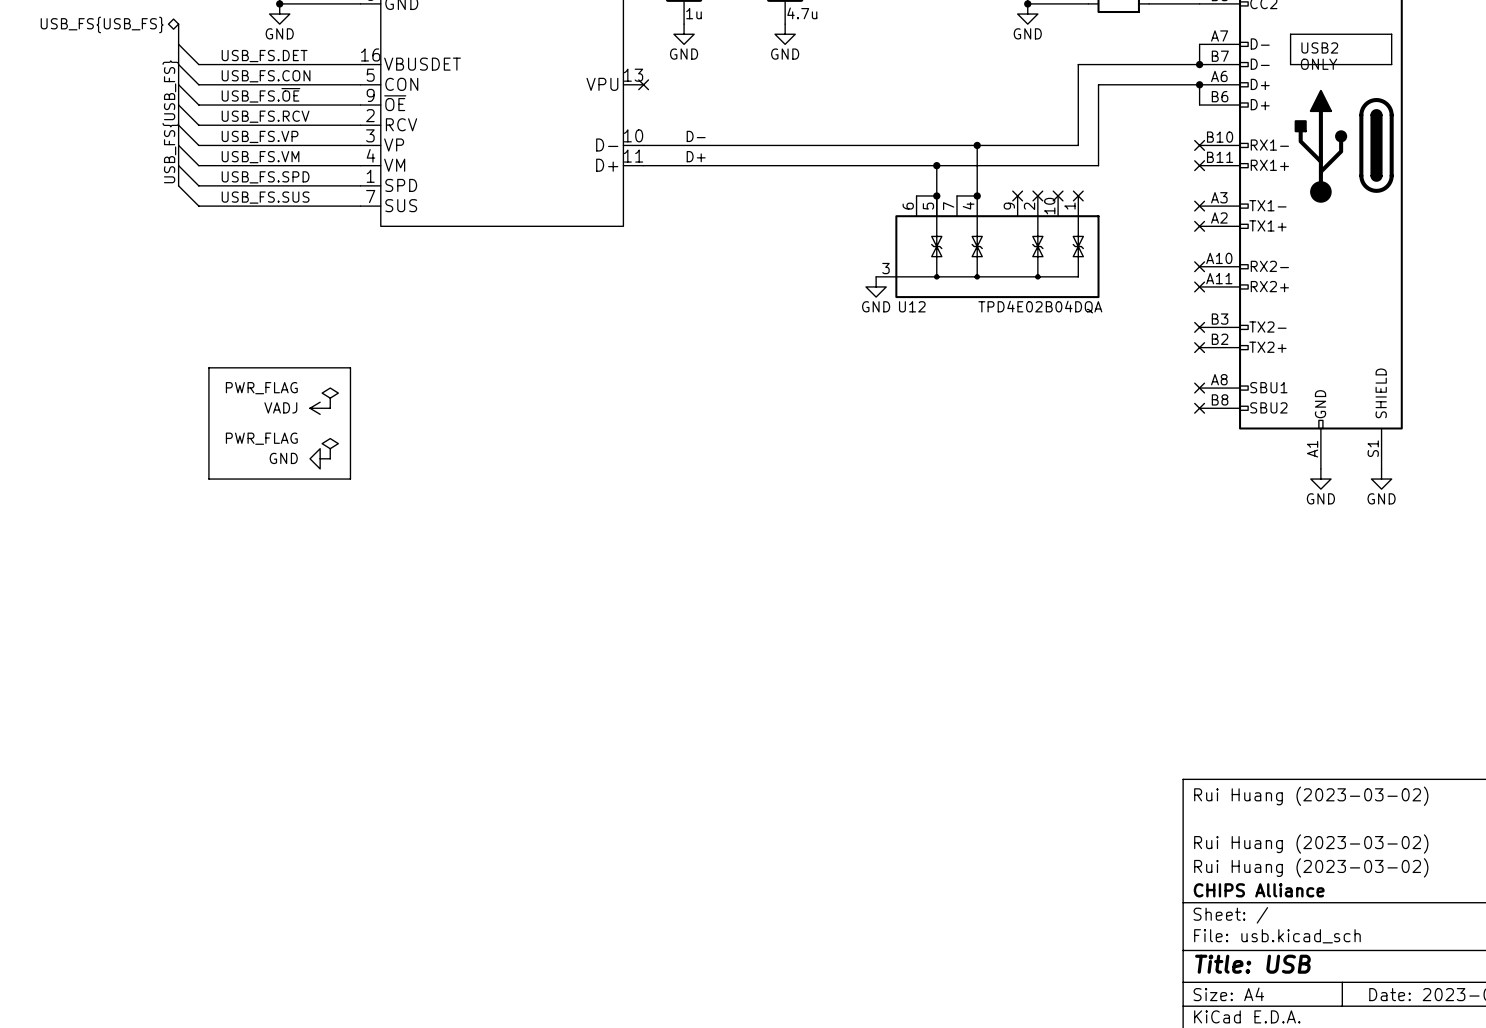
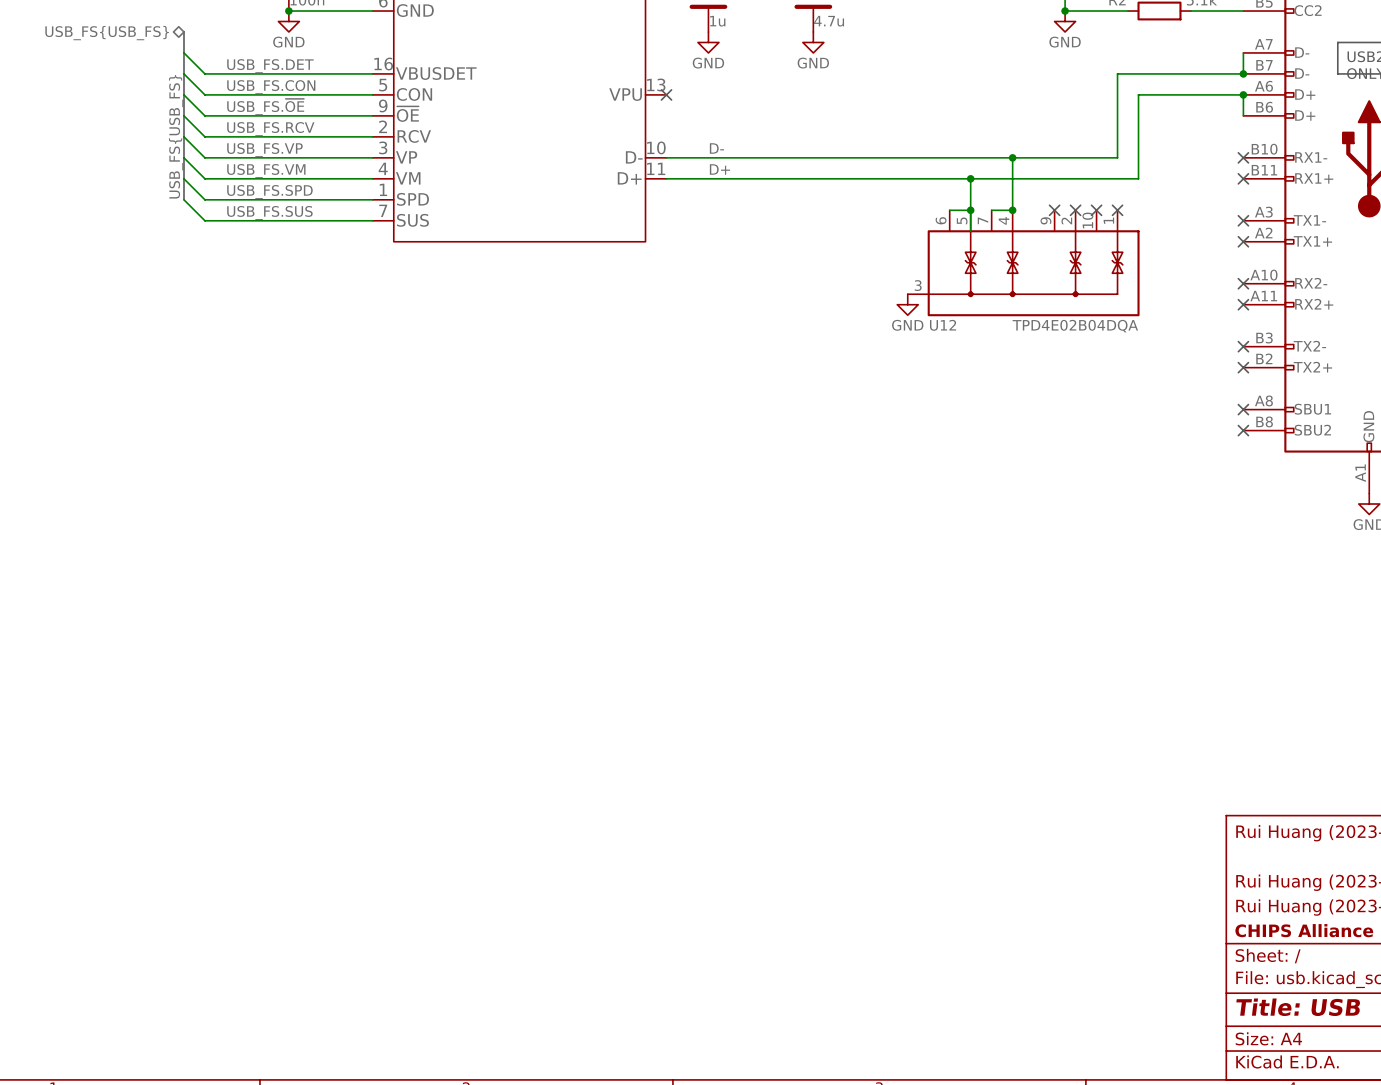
line: (208, 367) (208, 479) (350, 479) (350, 367) (208, 367) -> none
power symbol: PWR_FLAG (330, 398) -> none
power symbol: VADJ (320, 408) -> none
power symbol: PWR_FLAG (330, 448) -> none
power symbol: GND (320, 458) -> none

